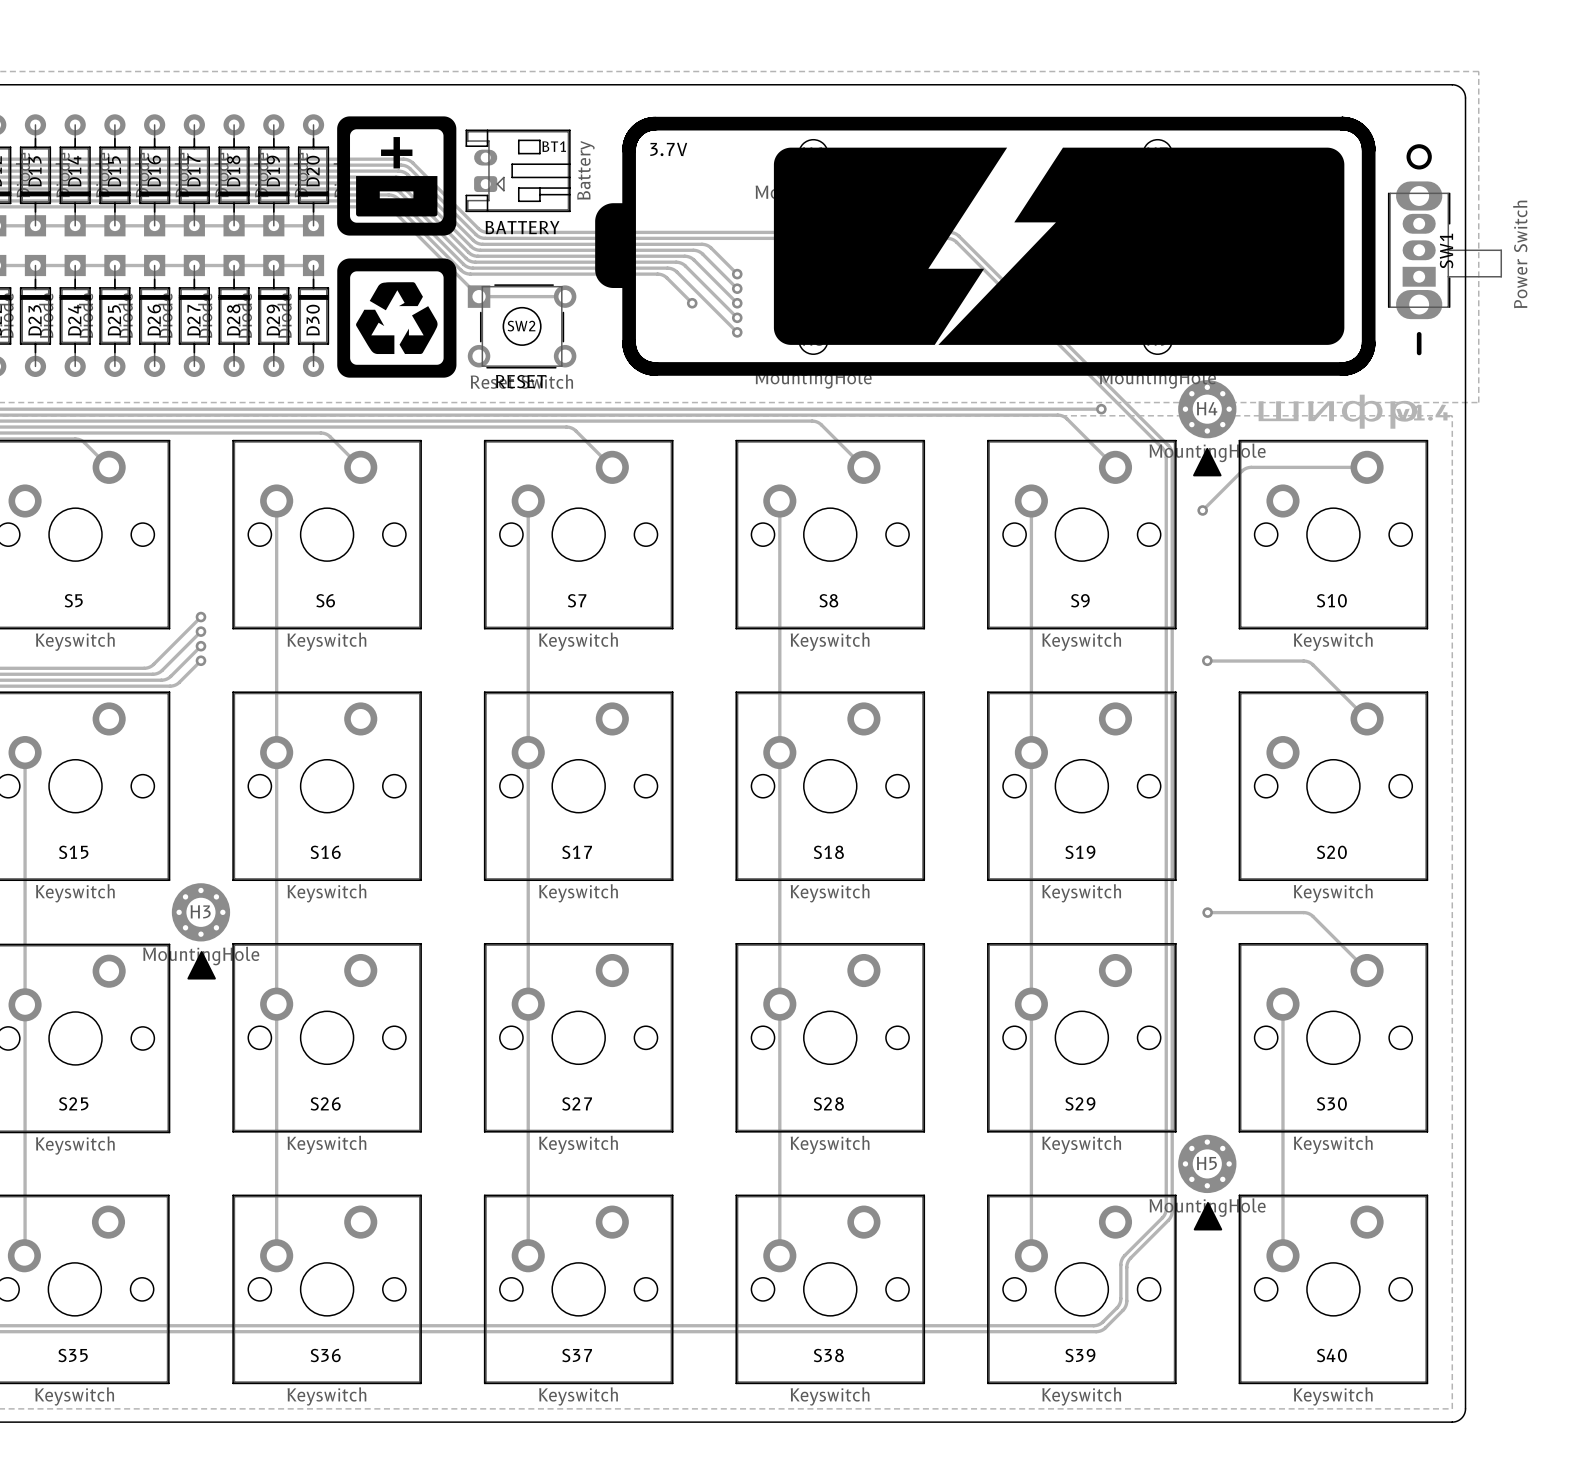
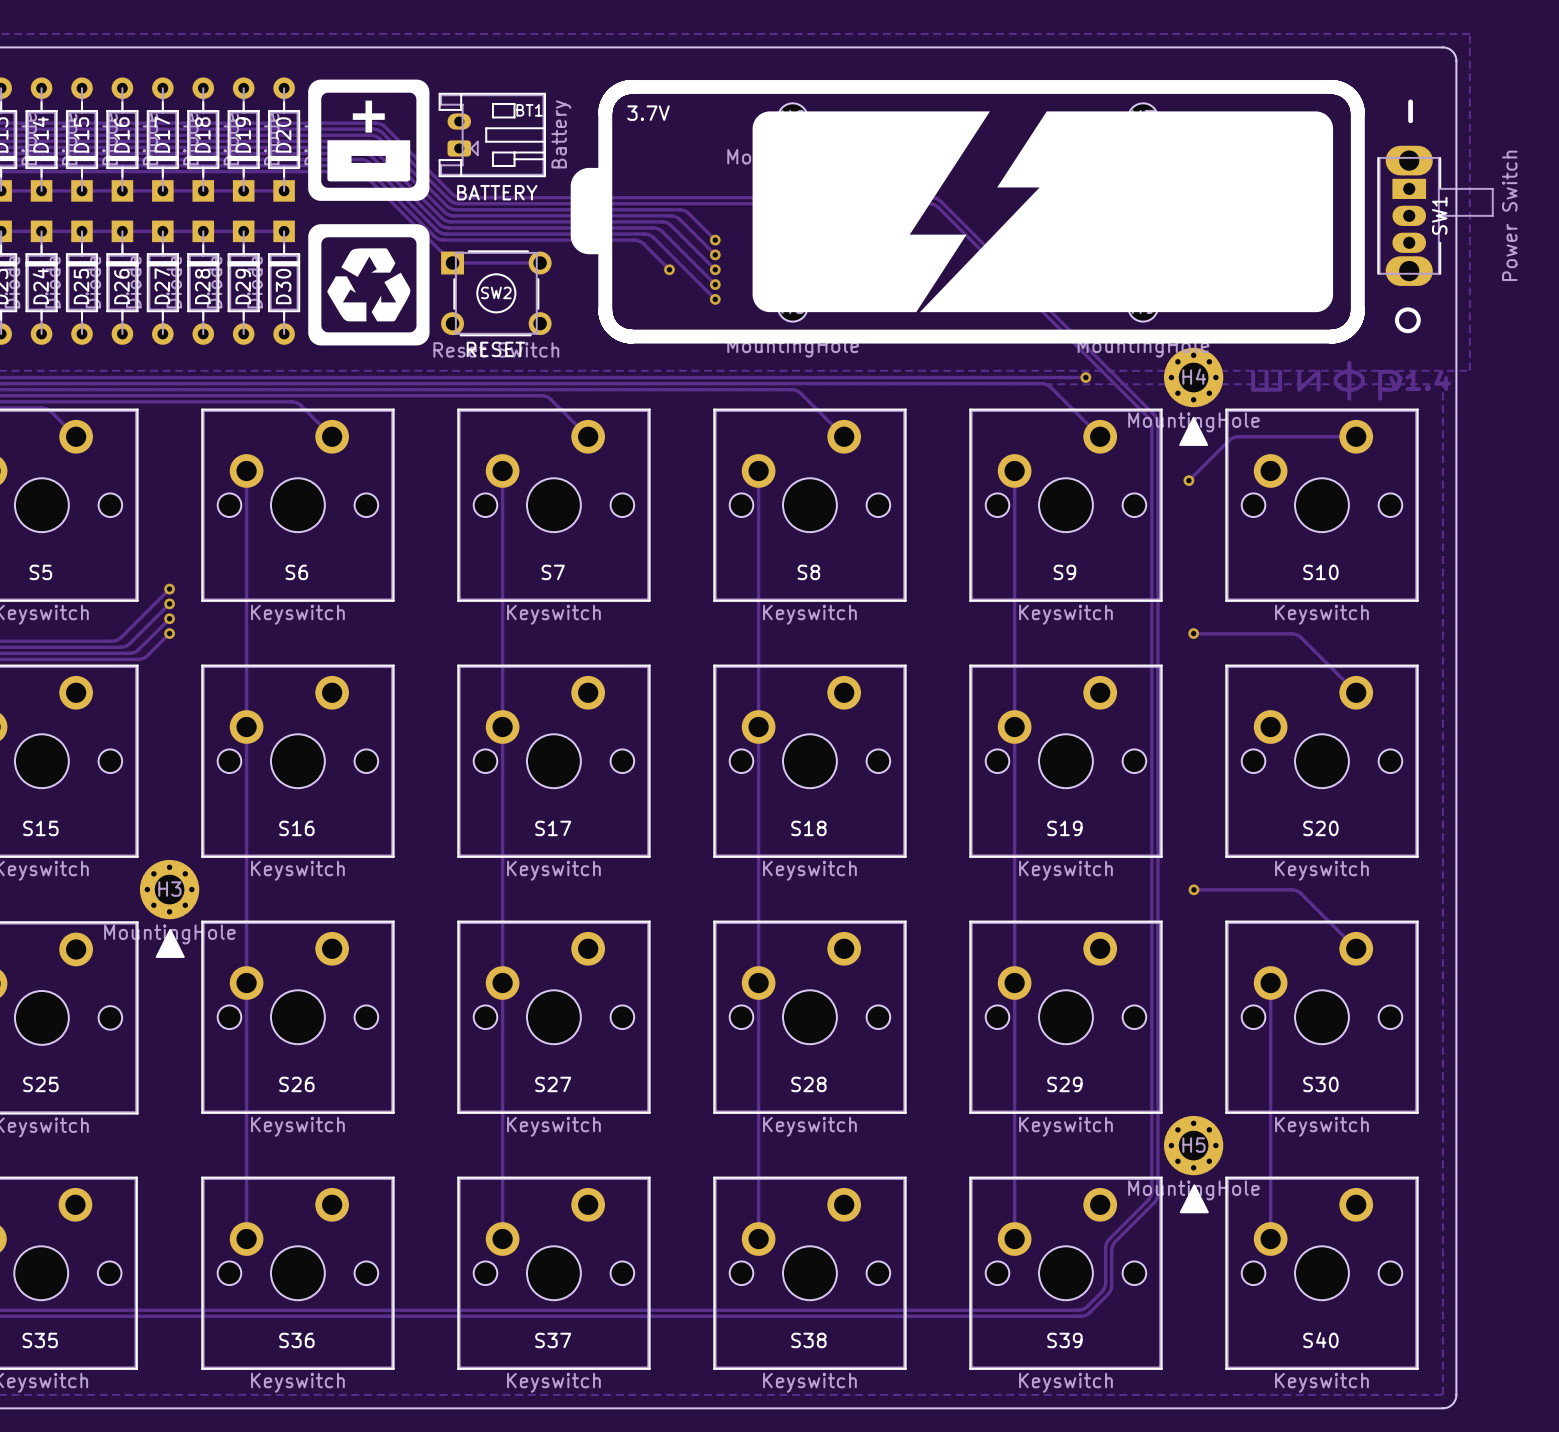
drawing: none -> [1408, 99, 1413, 124]
drawing position: (1419, 156) -> (1407, 320)
SW1 footprint: [1387, 181, 1502, 320] -> [1377, 145, 1494, 286]
drawing: [1416, 332, 1422, 356] -> none

